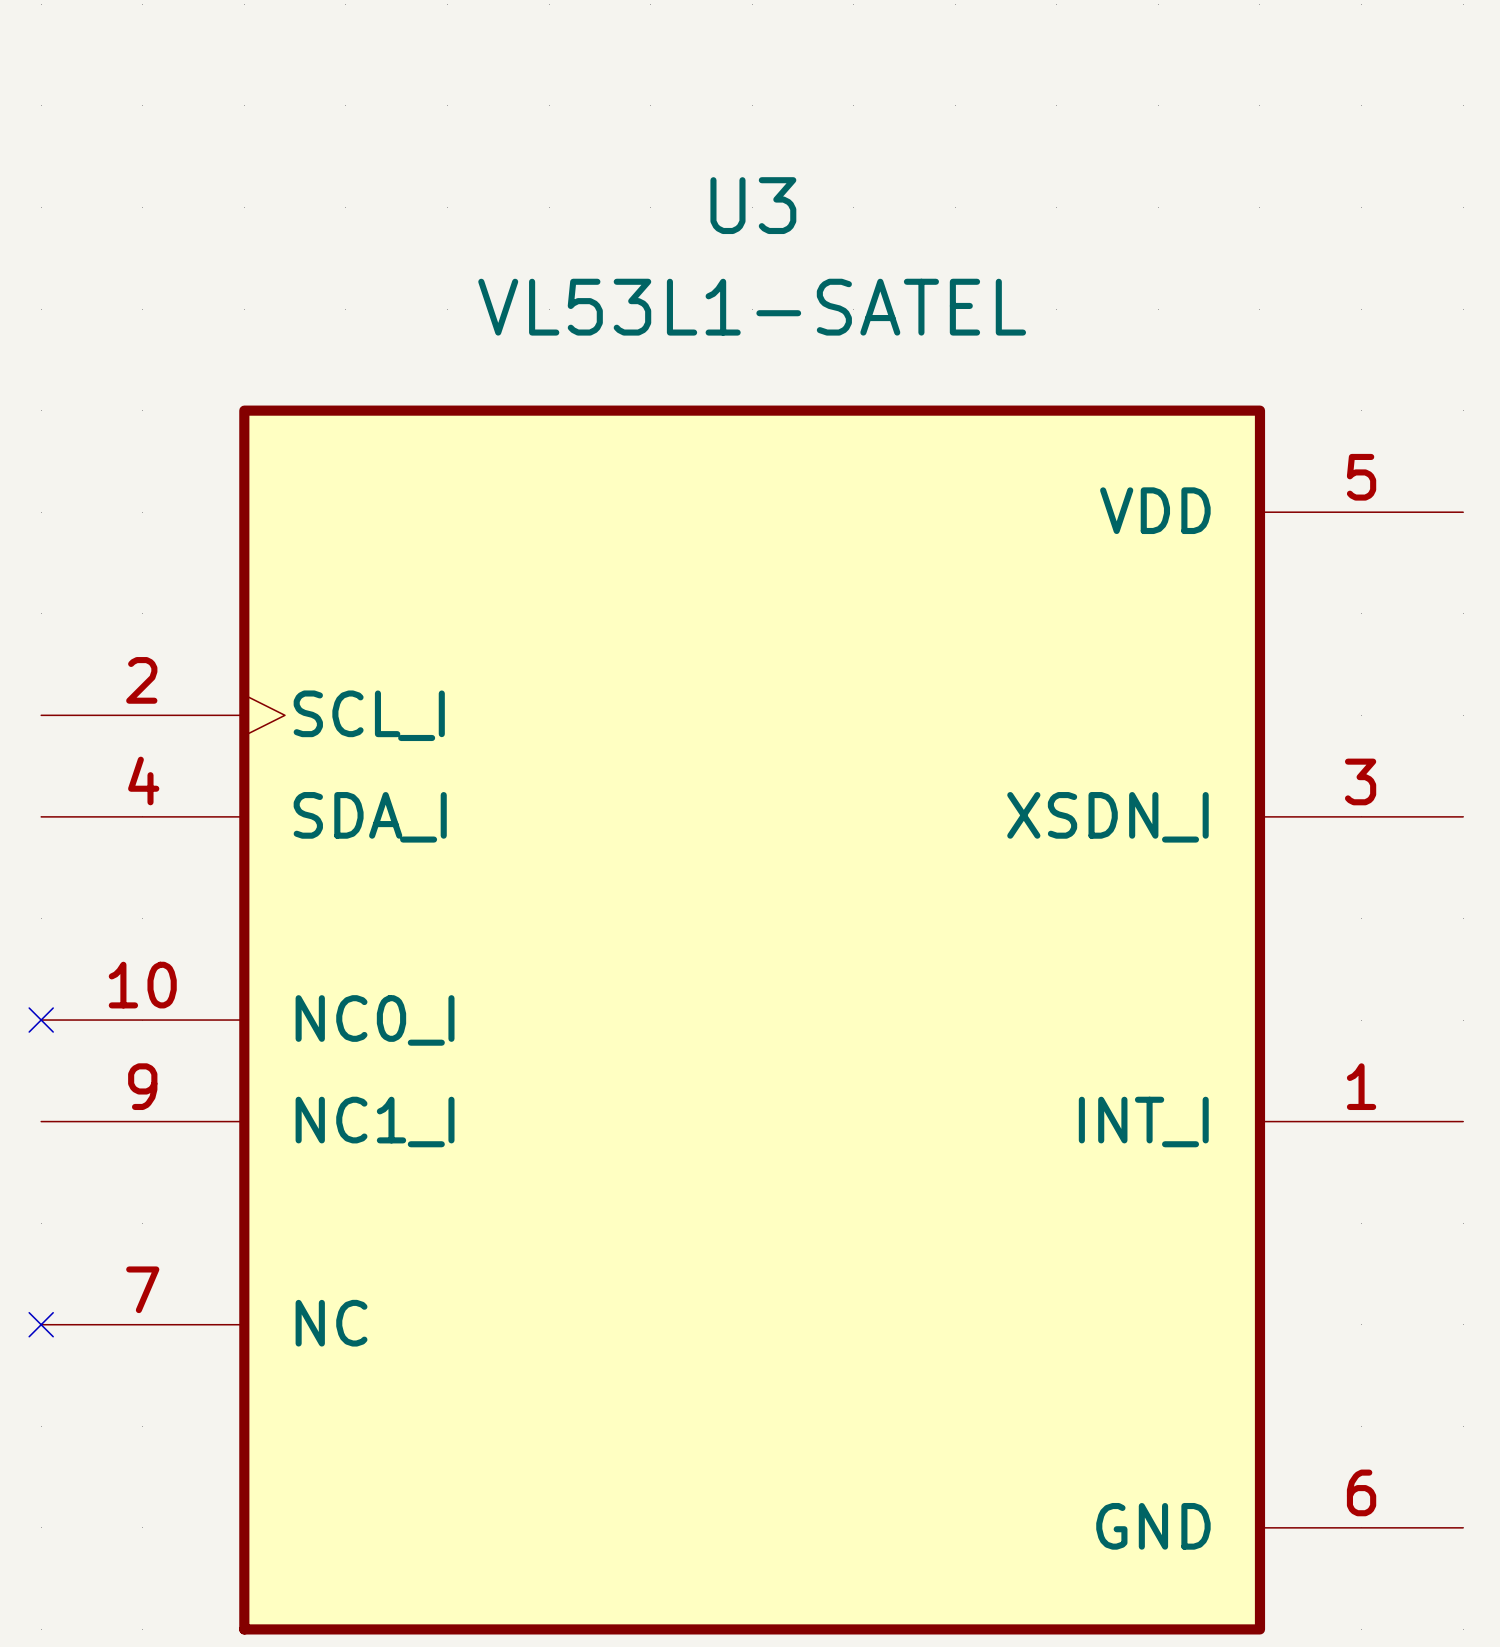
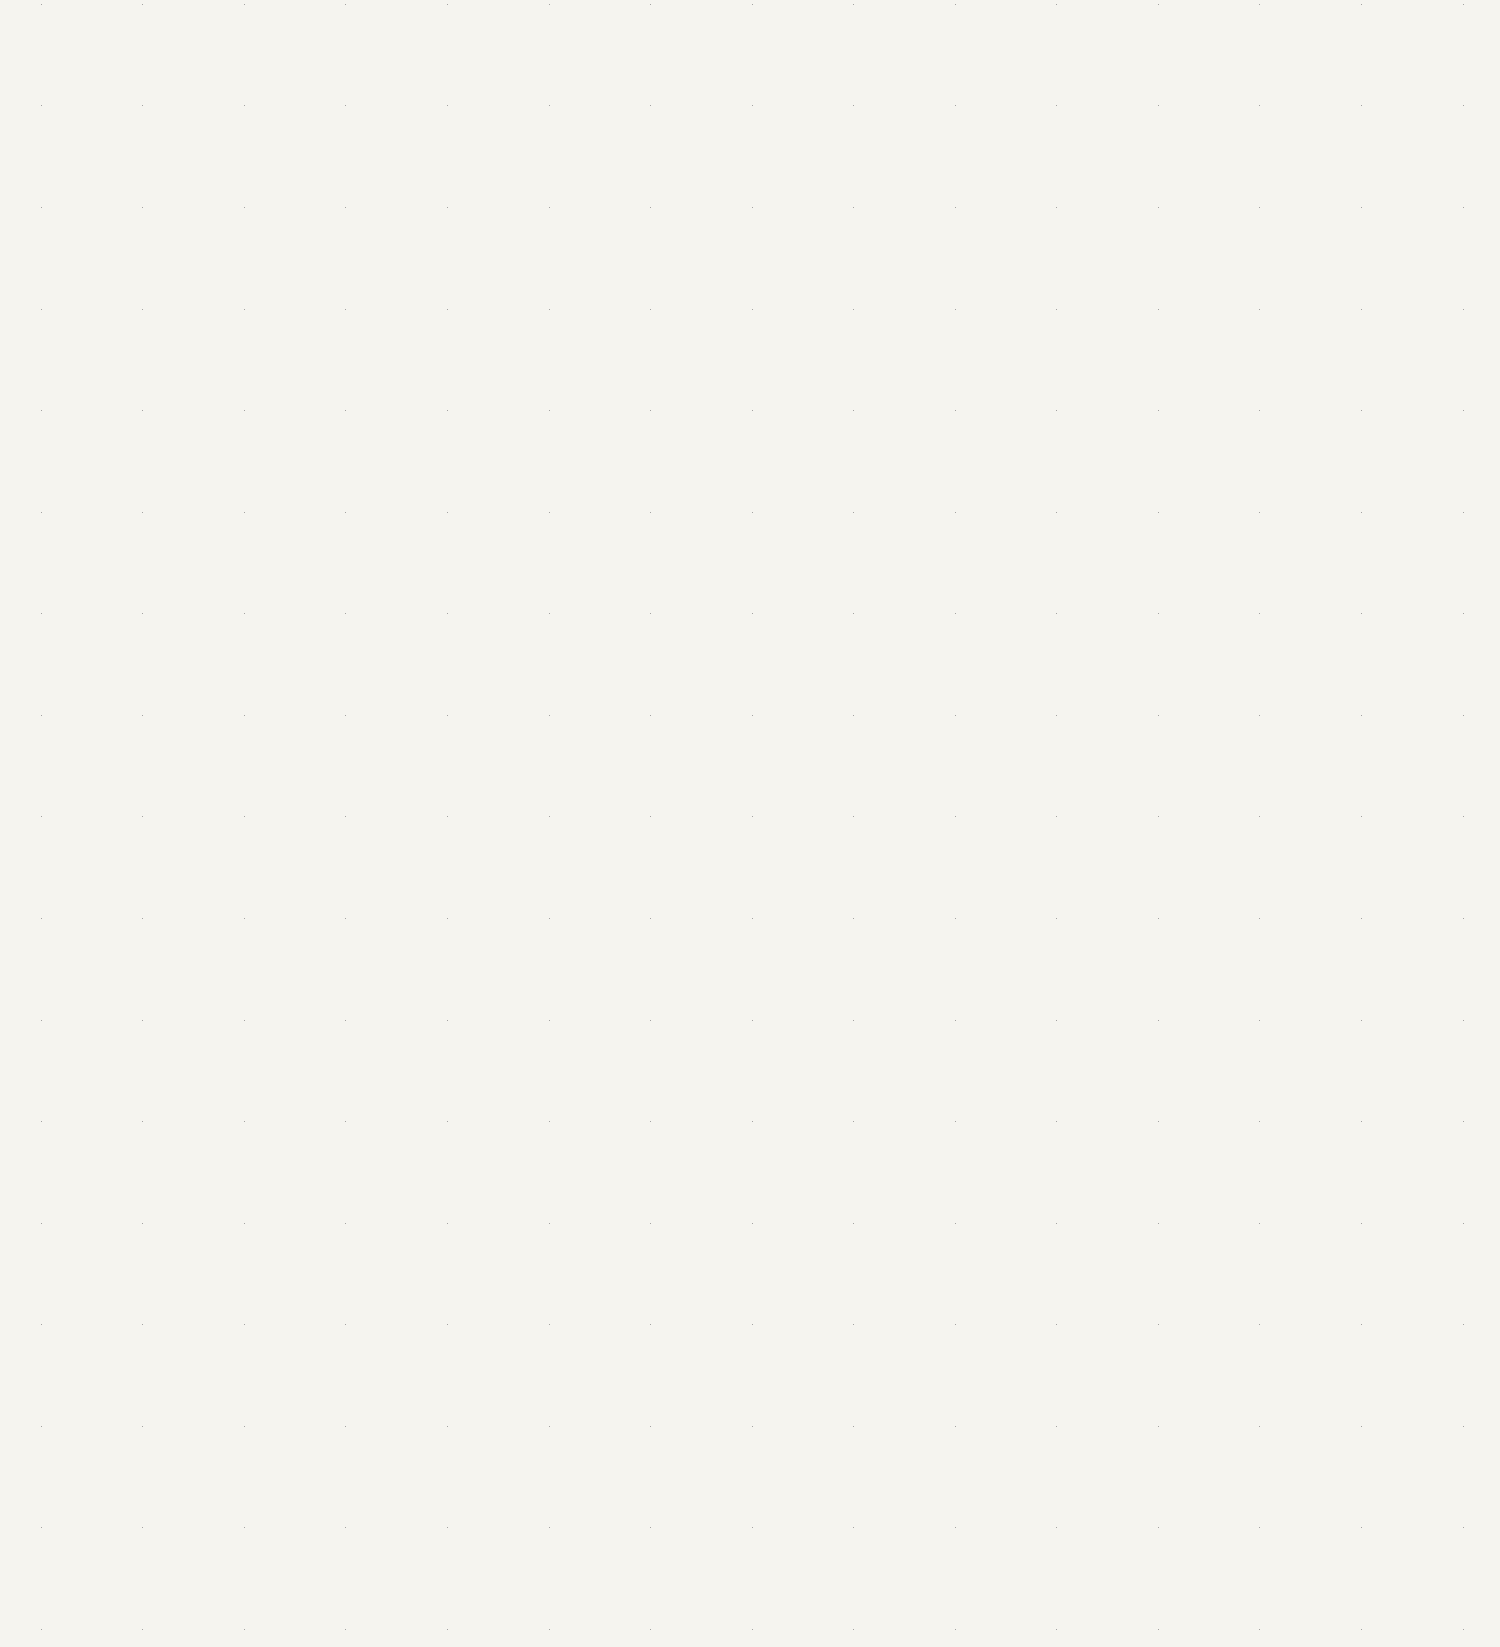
U3: VL53L1-SATEL (746, 1020) -> none

